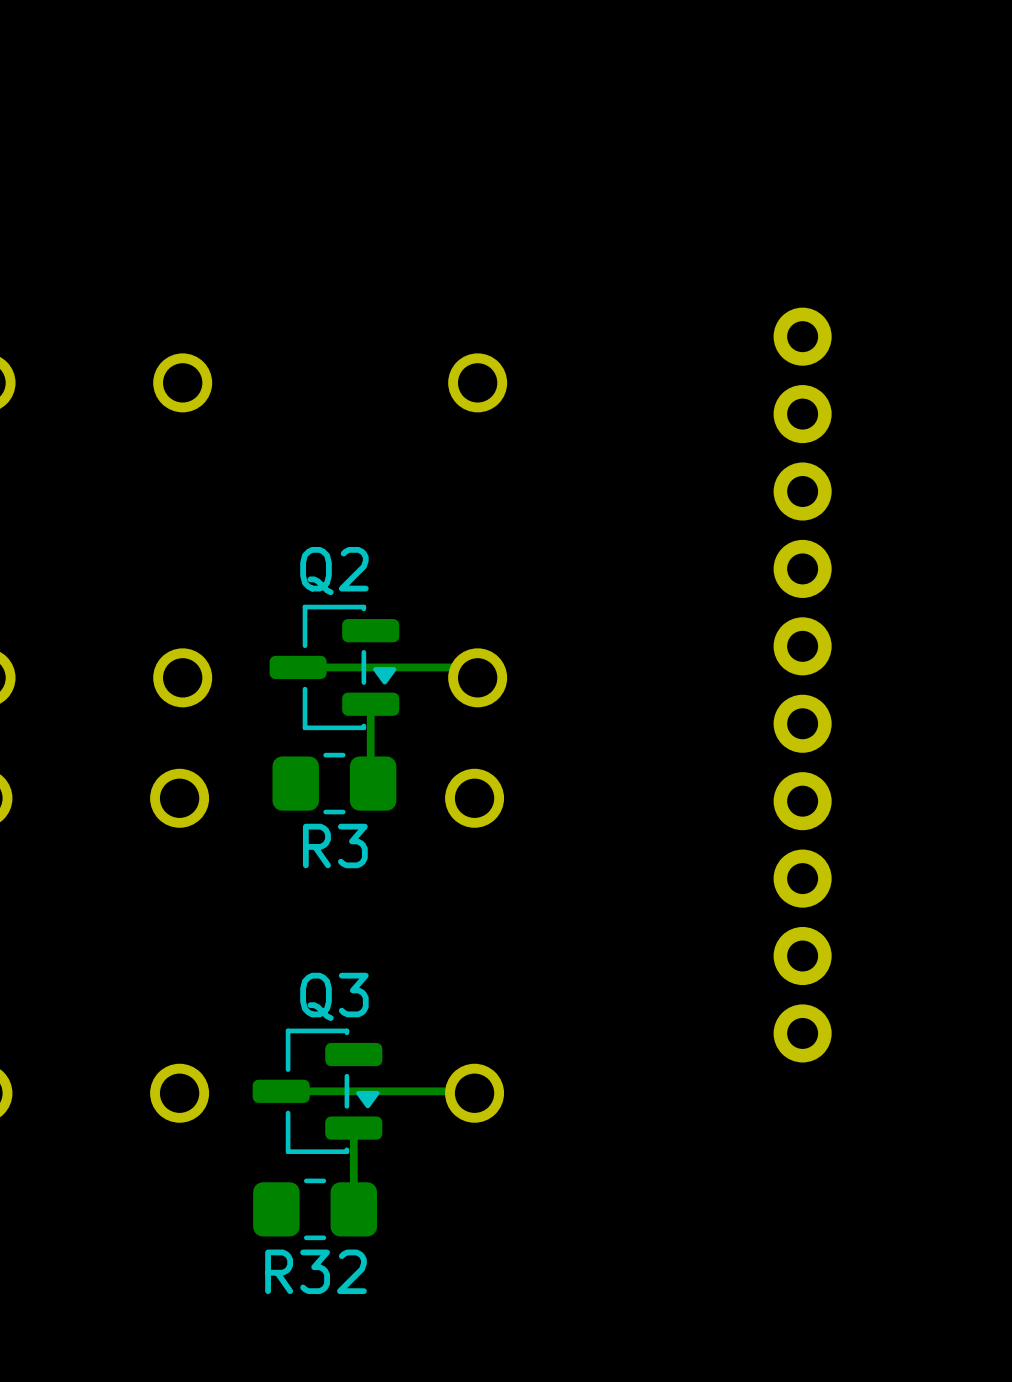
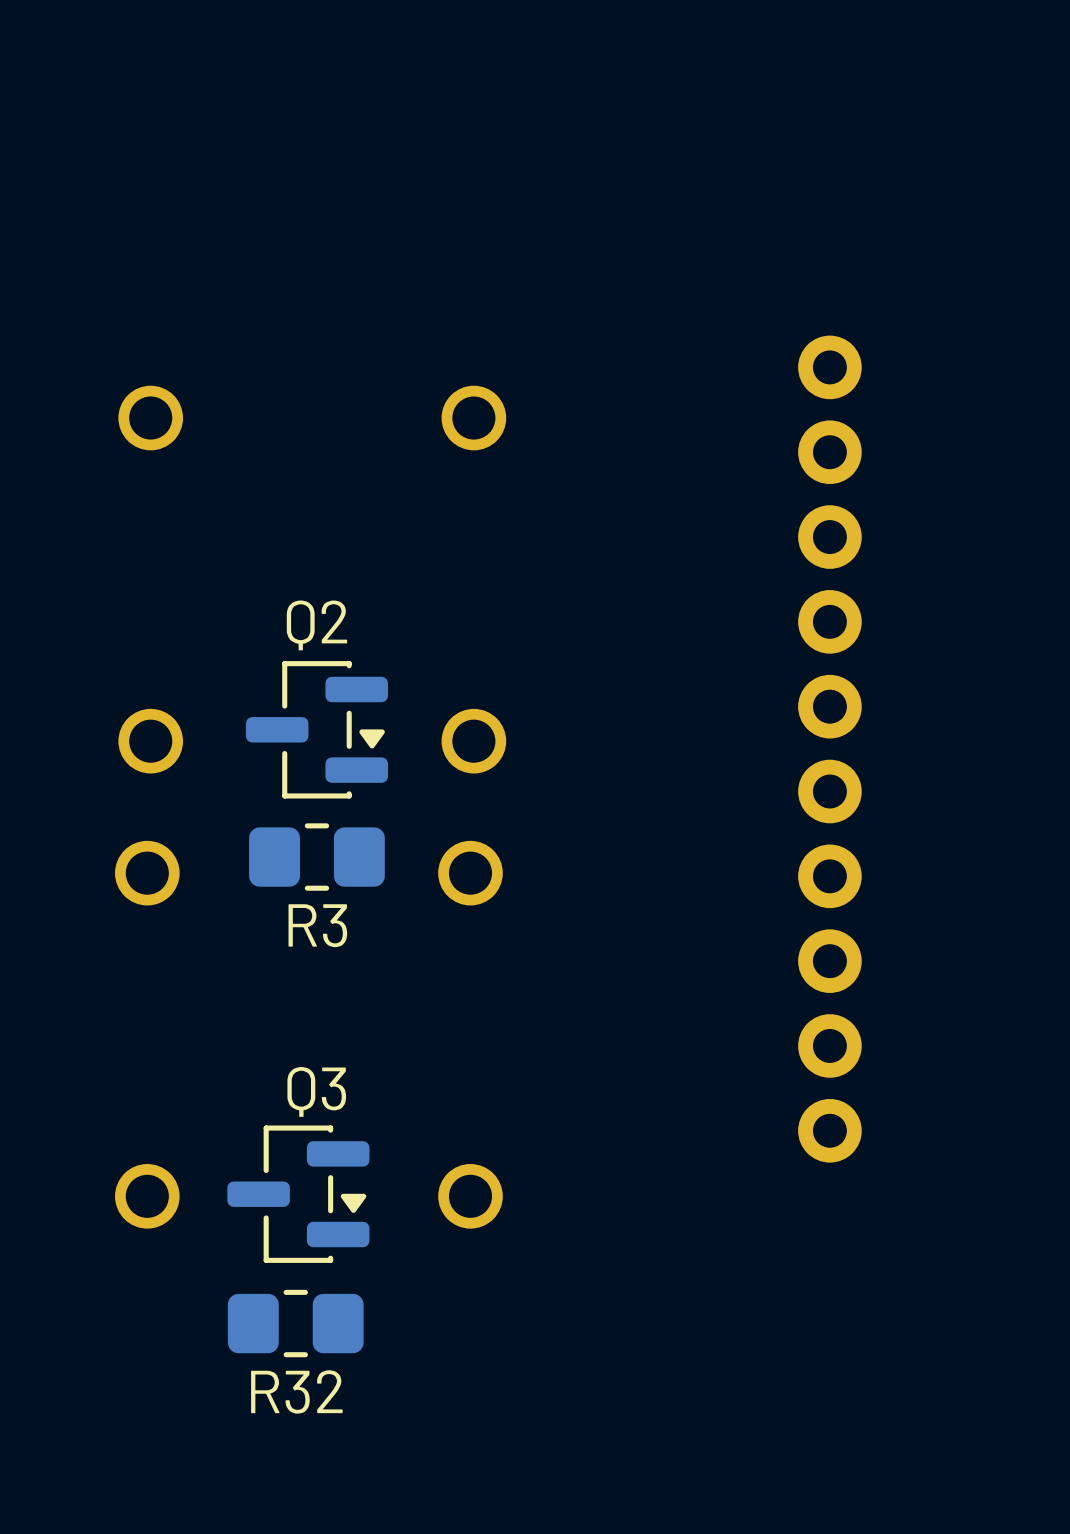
track: (298, 667) (467, 667) (477, 677) -> none
track: (370, 704) (370, 781) (373, 783) -> none
track: (281, 1091) (472, 1091) (474, 1093) -> none
track: (353, 1128) (353, 1209) -> none

